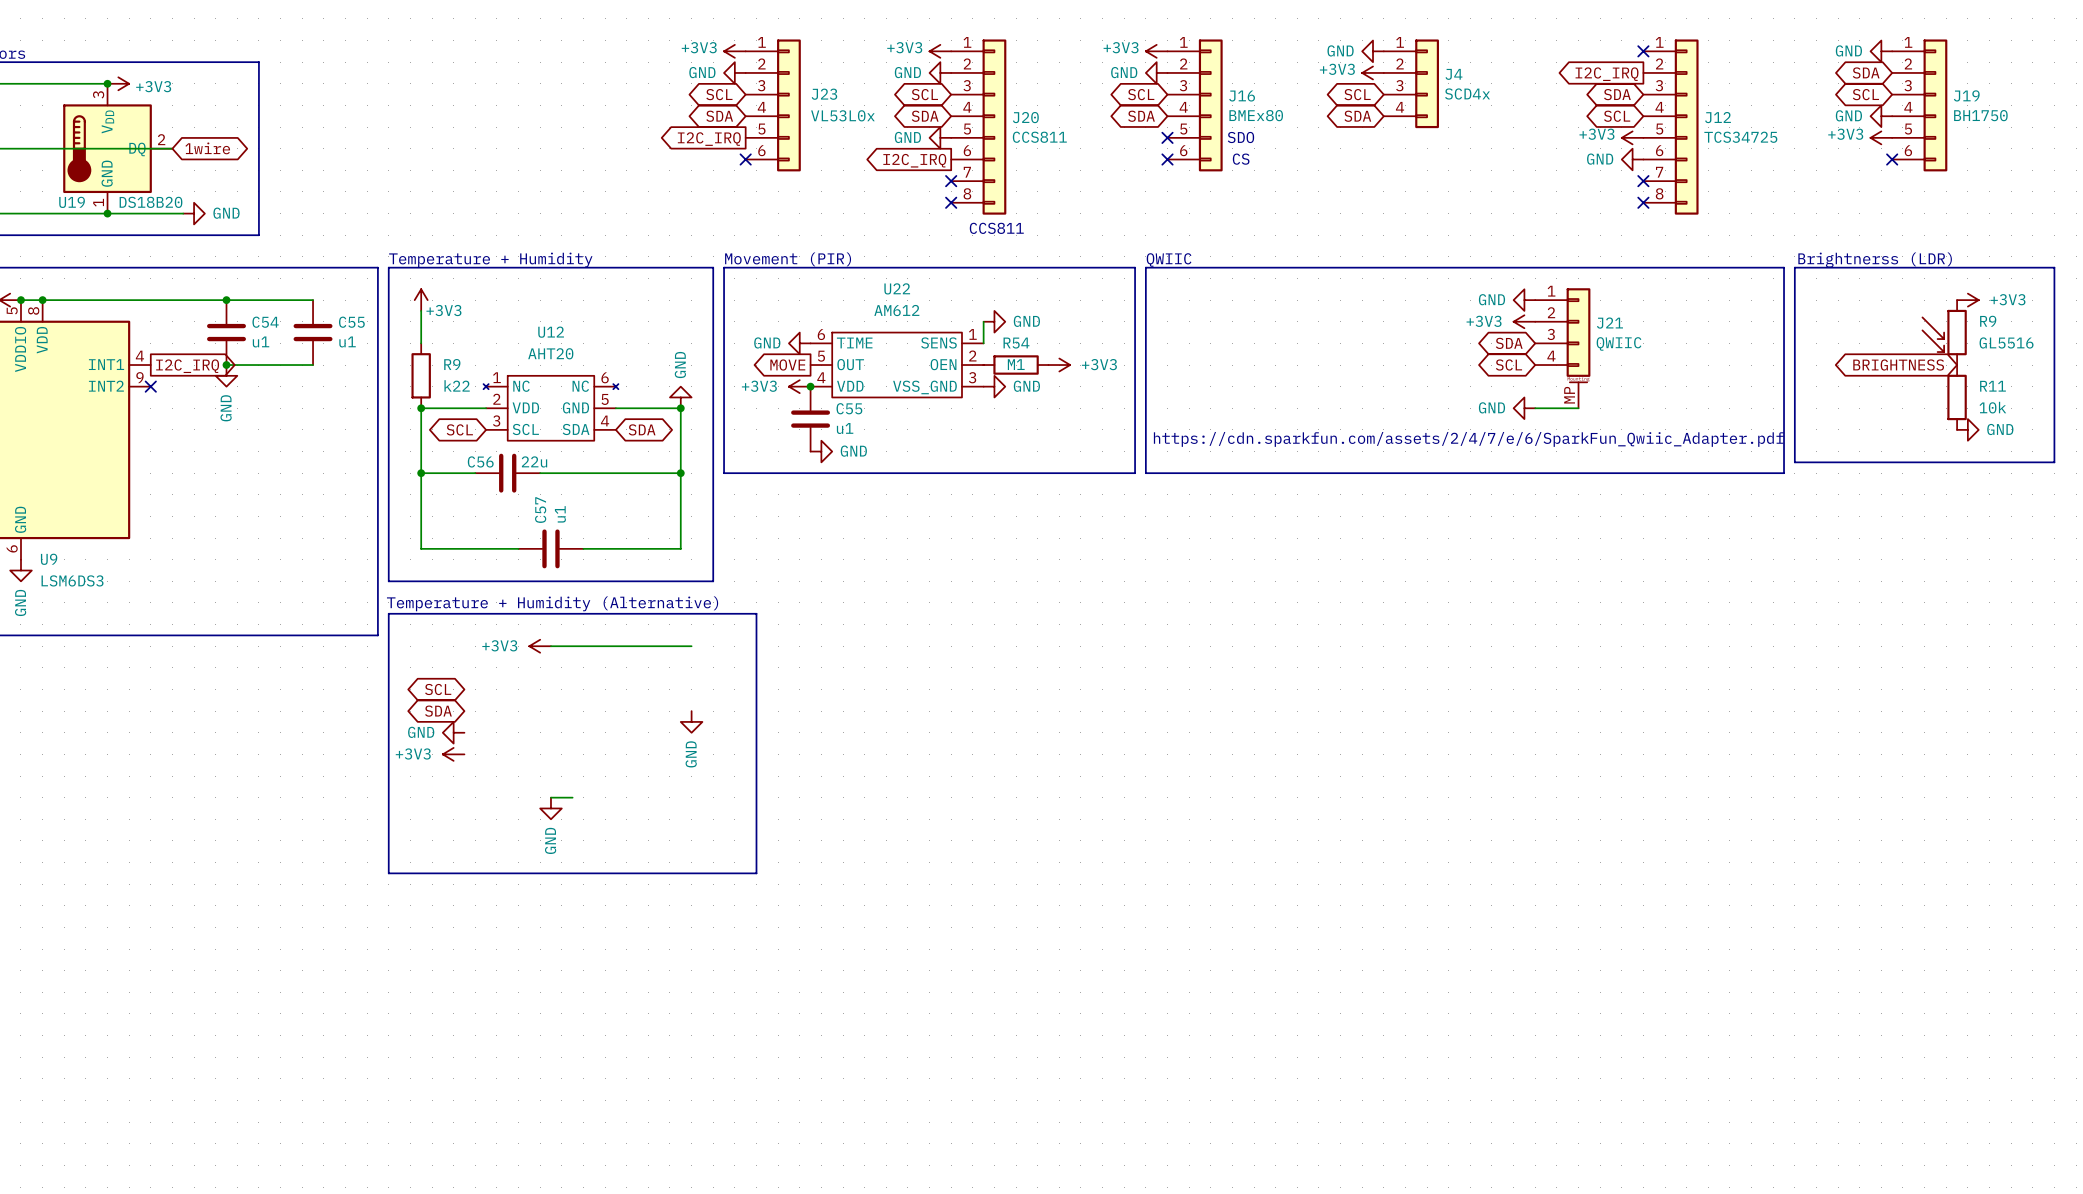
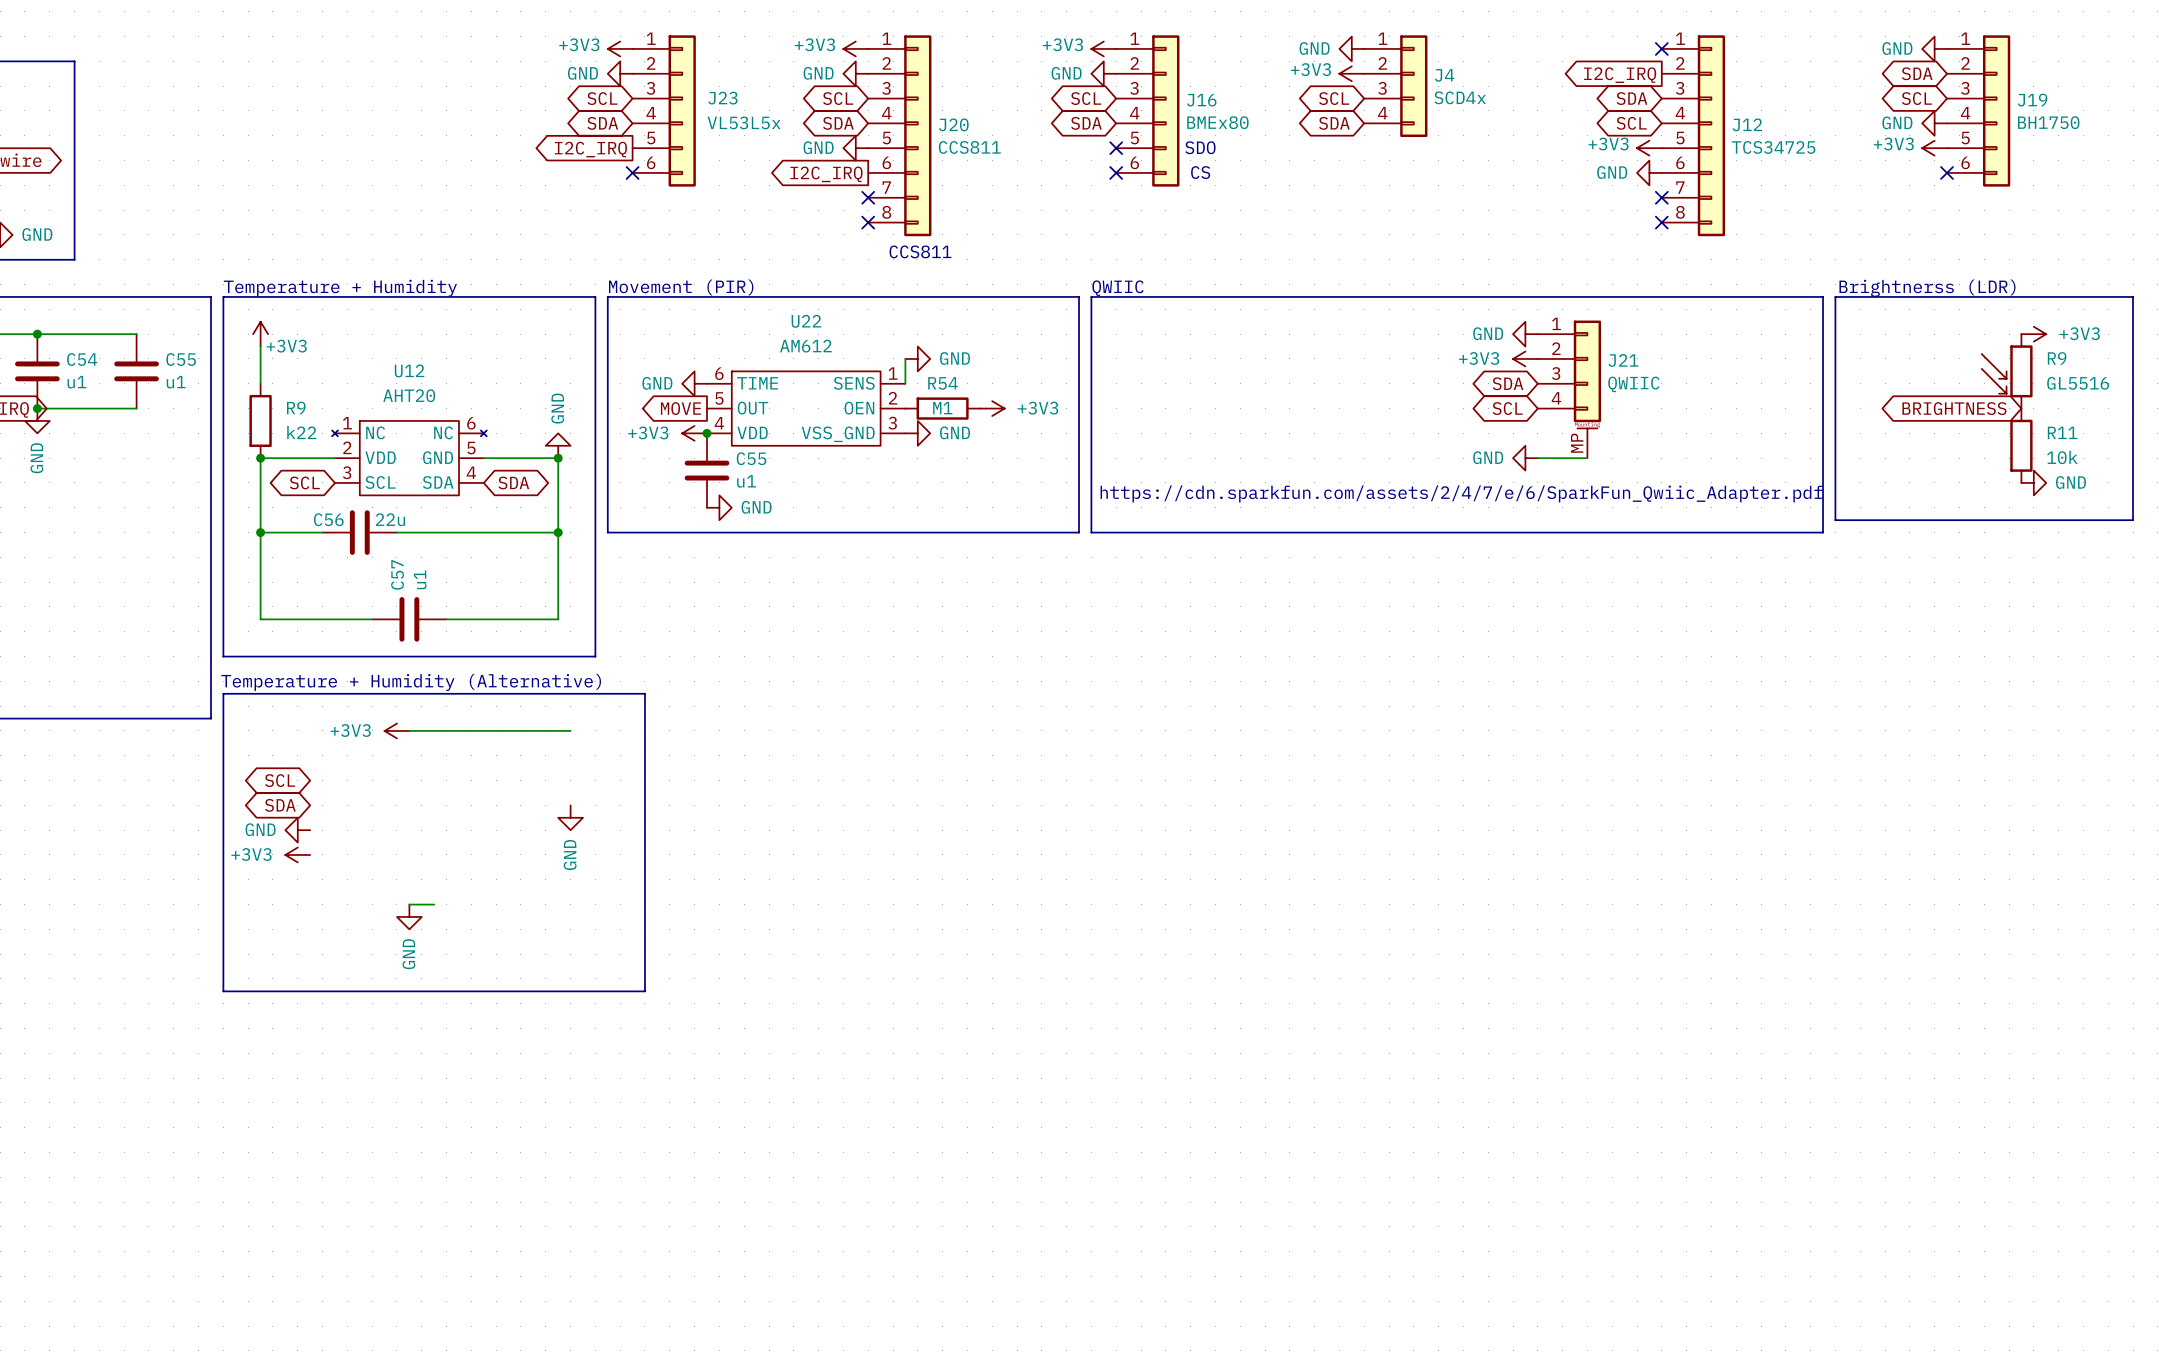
J23 value: VL53L0x (842, 115) -> VL53L5x (744, 122)

